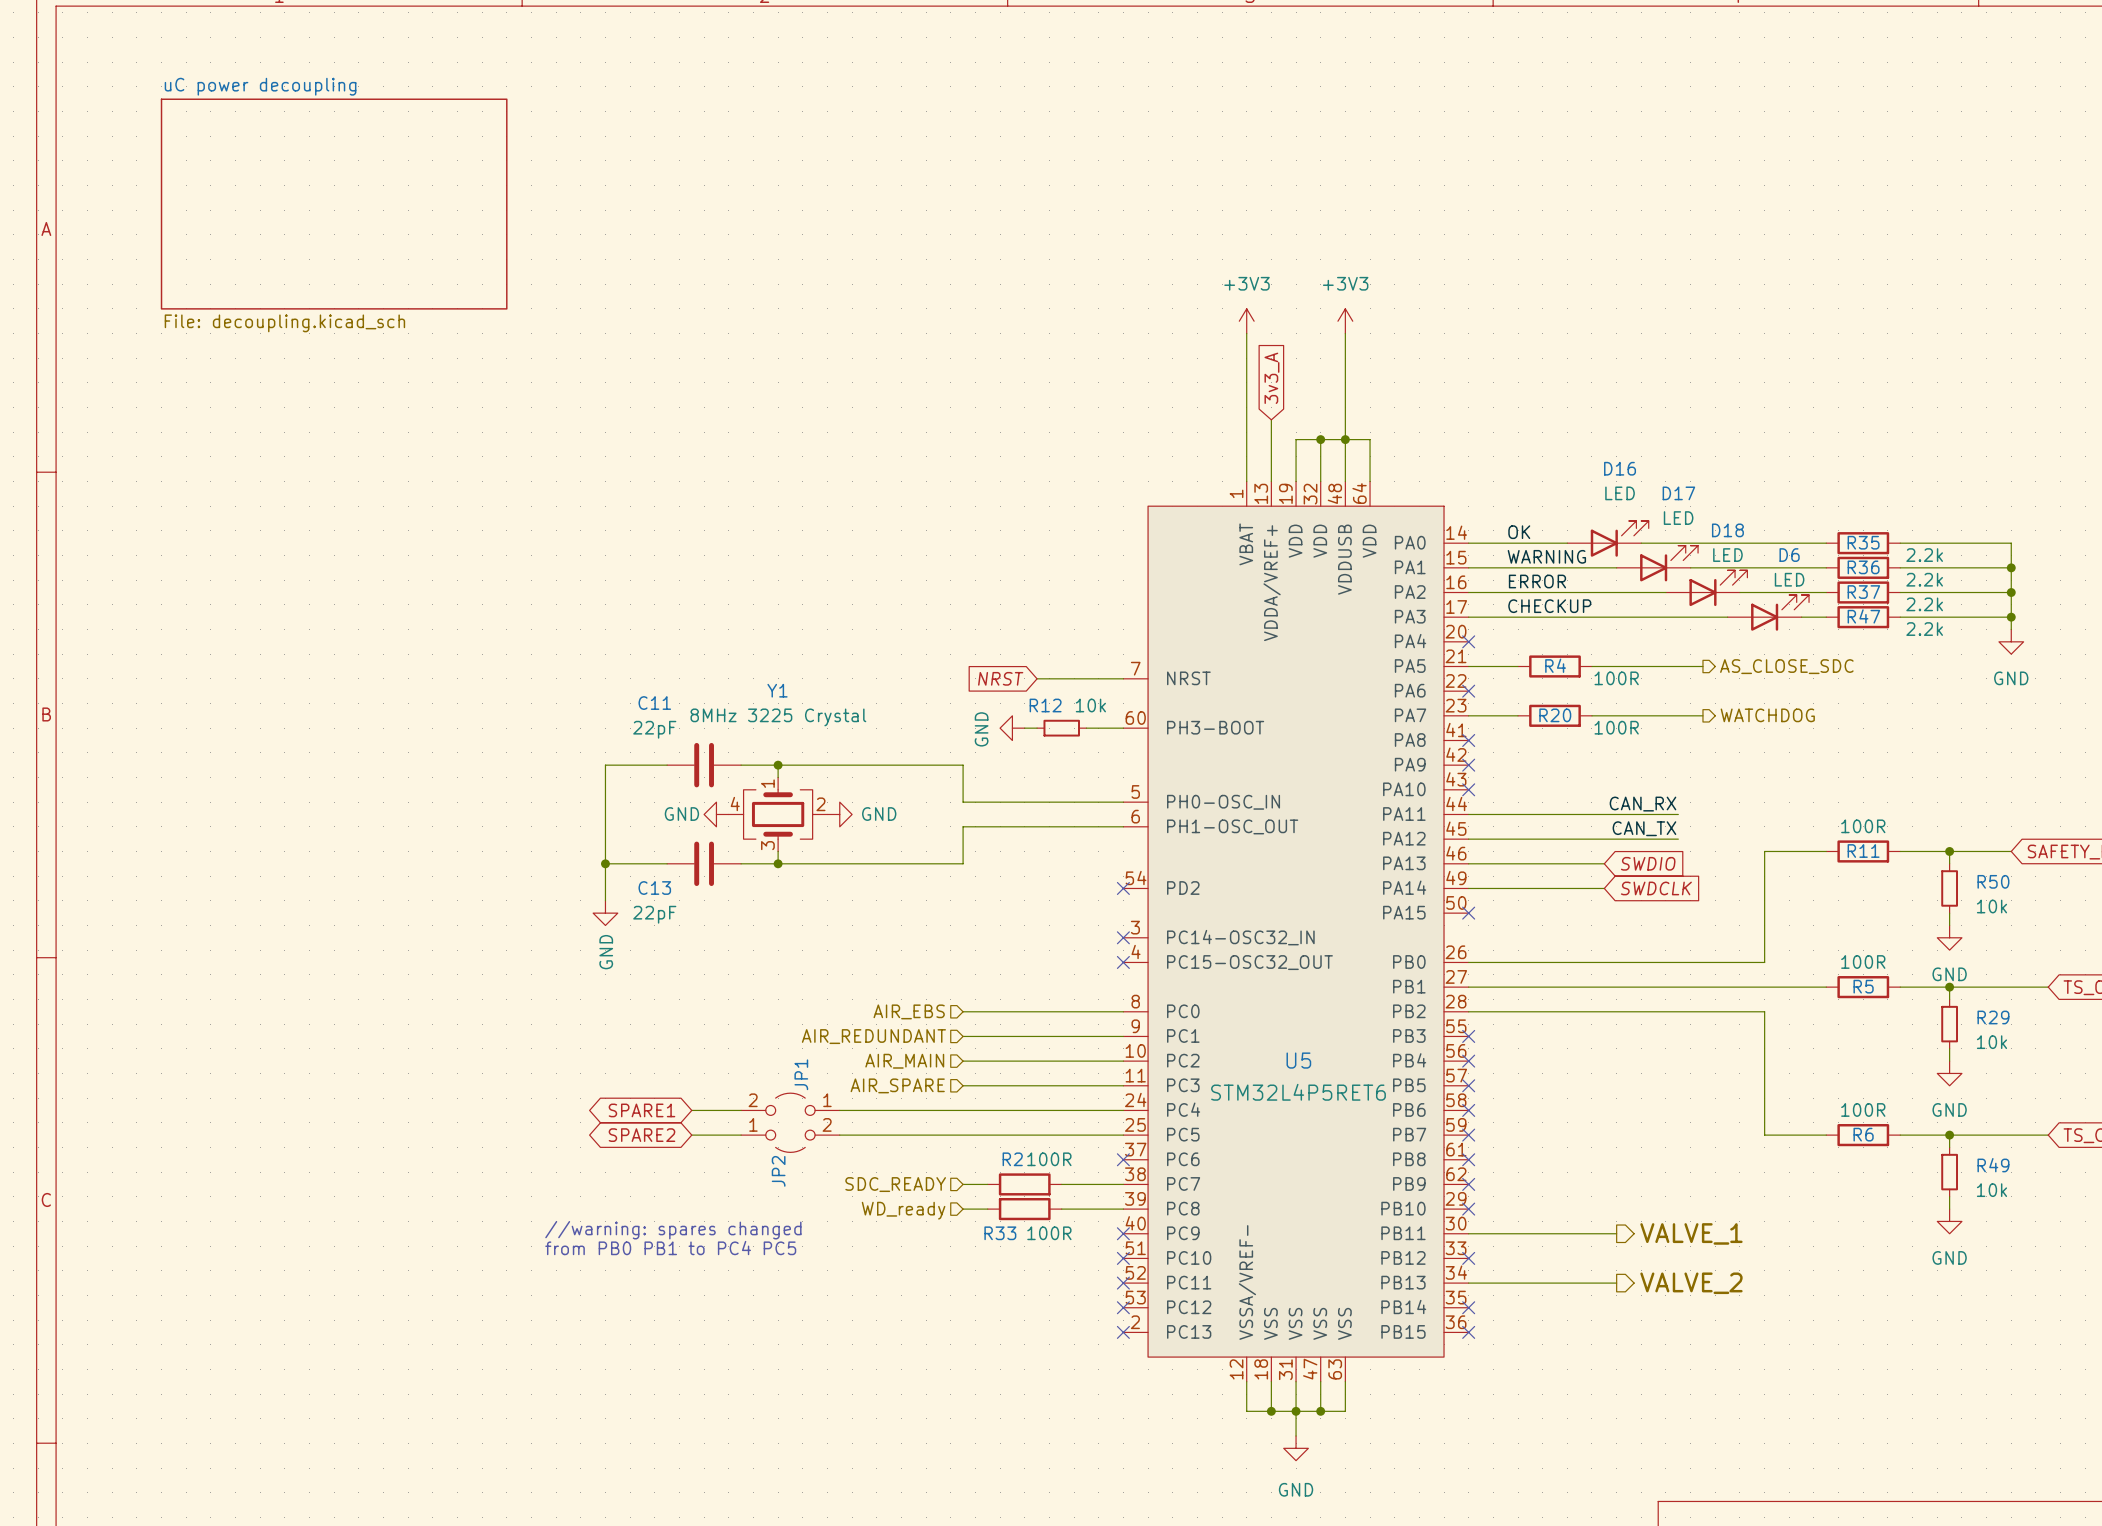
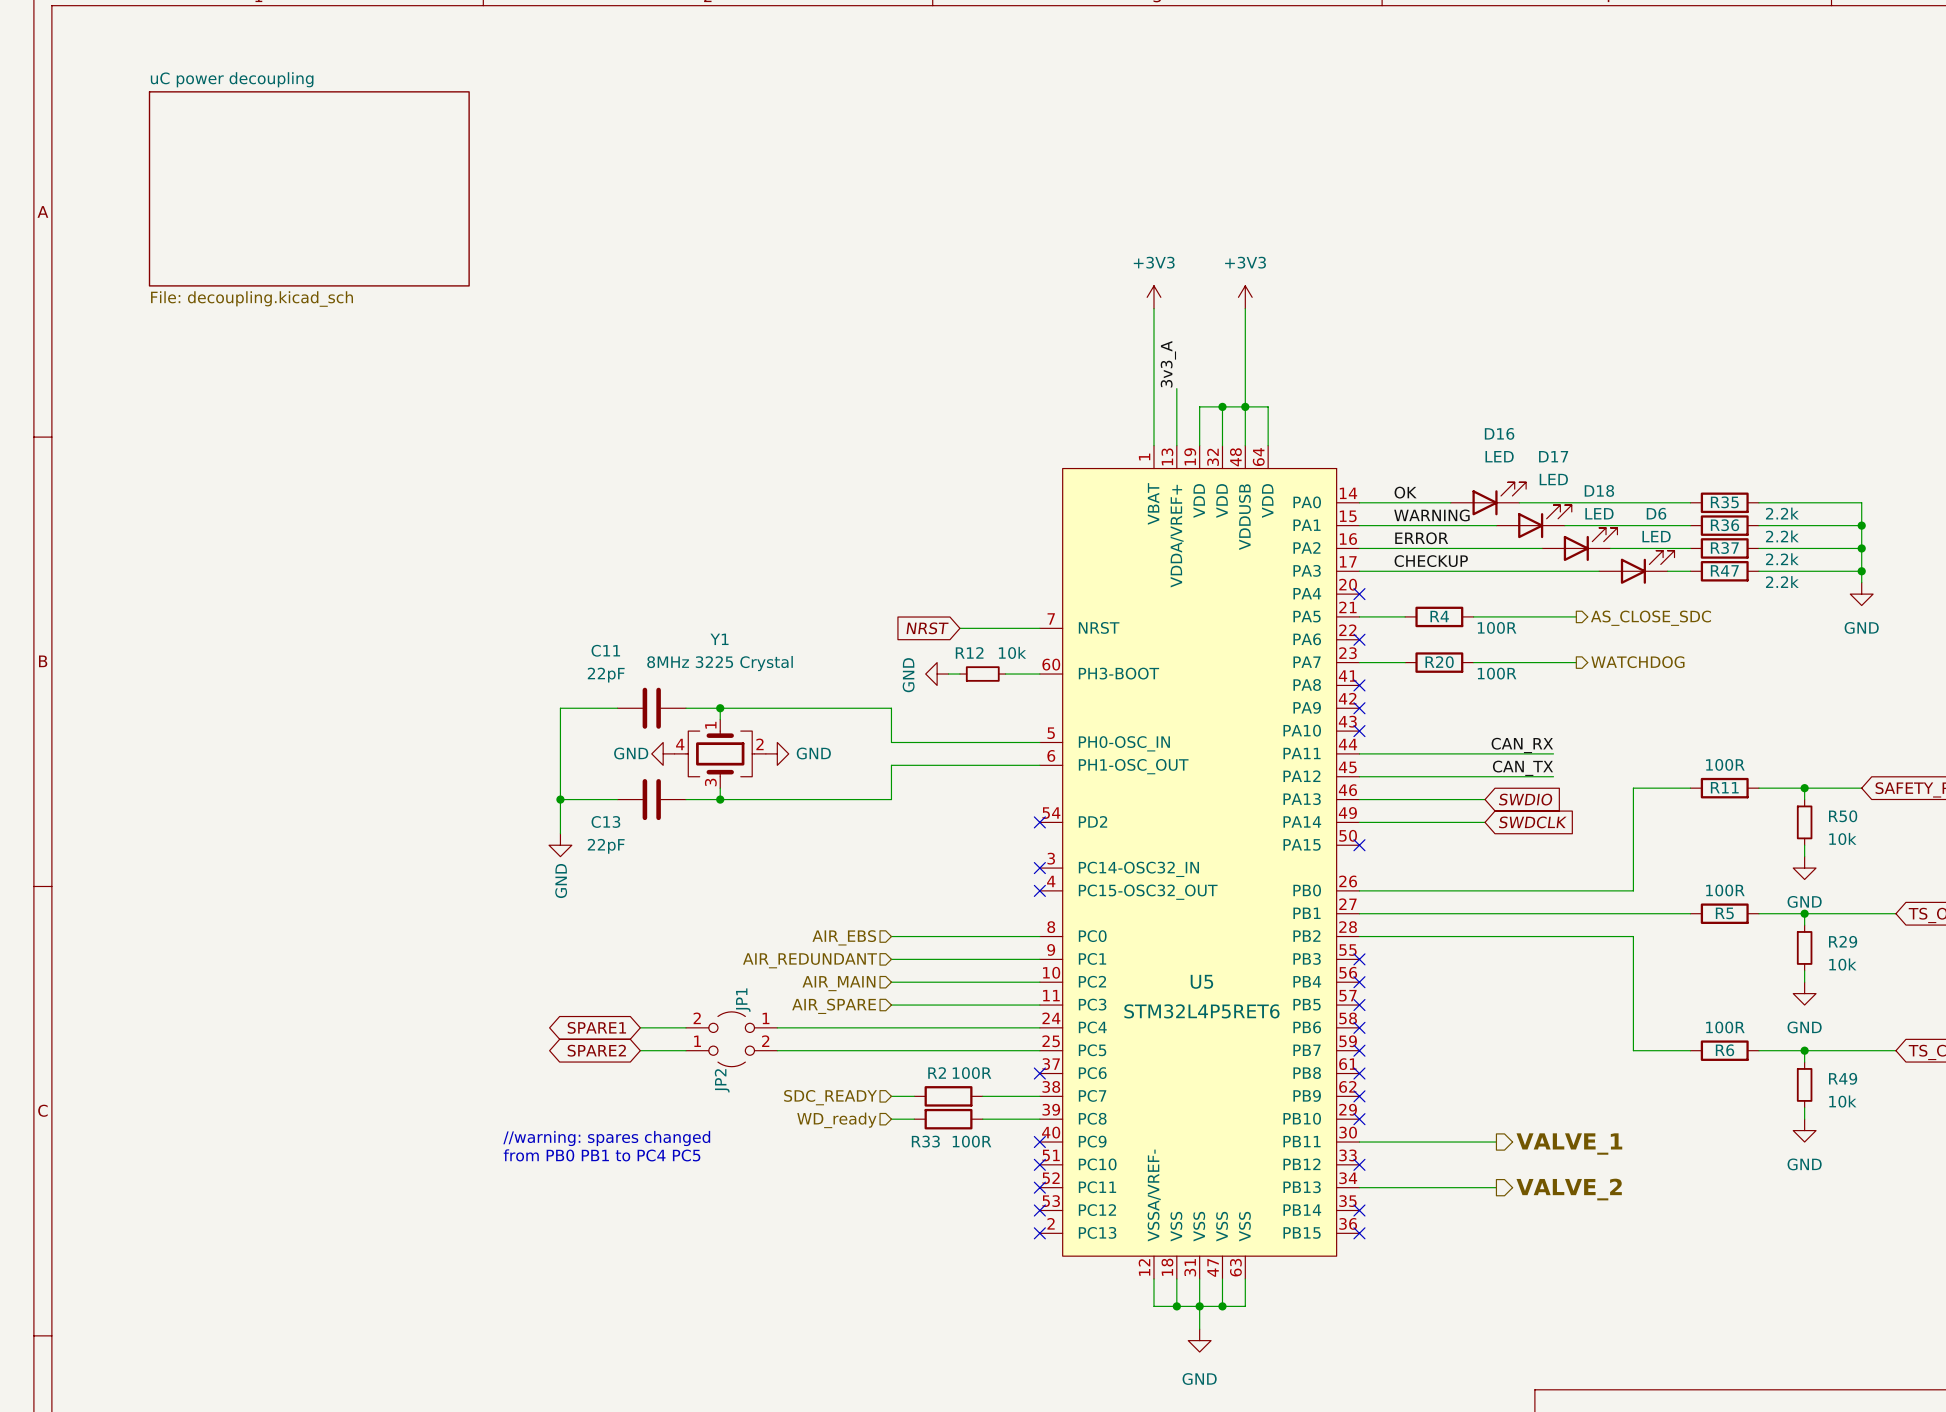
global label: 3v3_A (1271, 378) -> none
label: none -> 3v3_A (1168, 364)

